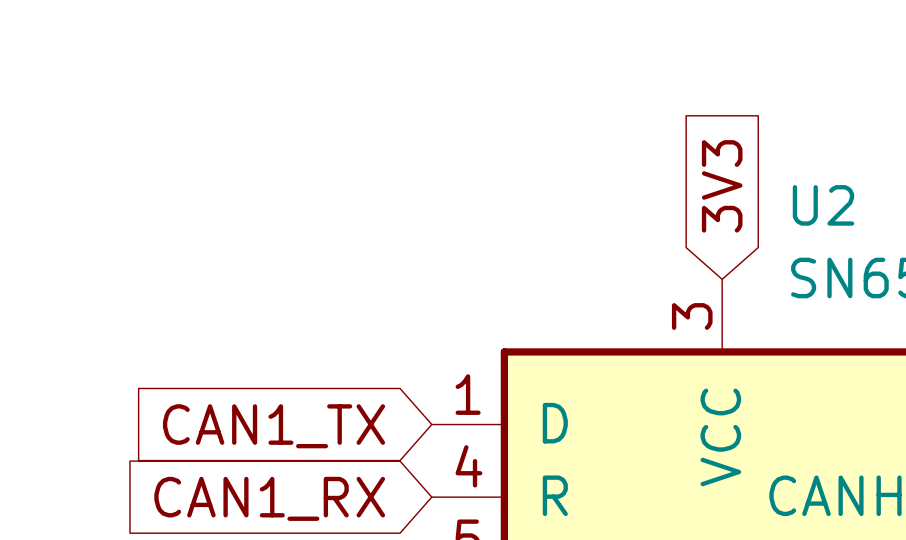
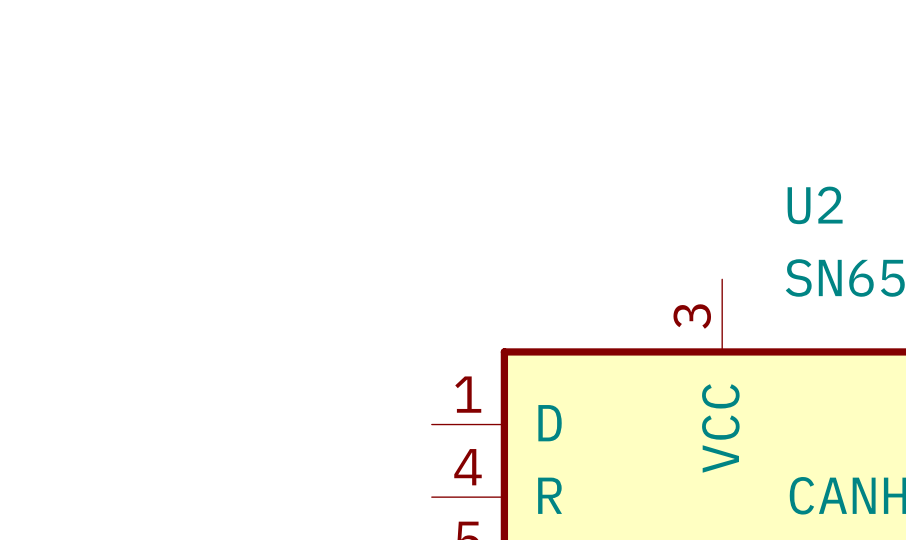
global label: 3V3 (722, 186) -> none
global label: CAN1_TX (274, 426) -> none
global label: CAN1_RX (269, 498) -> none

